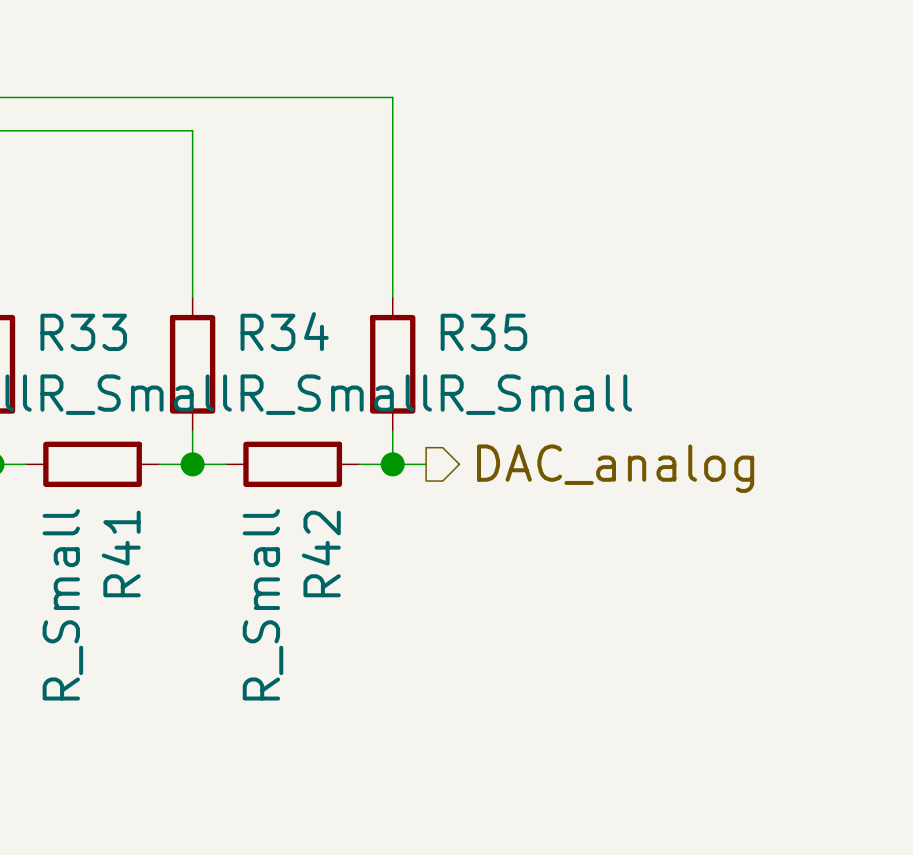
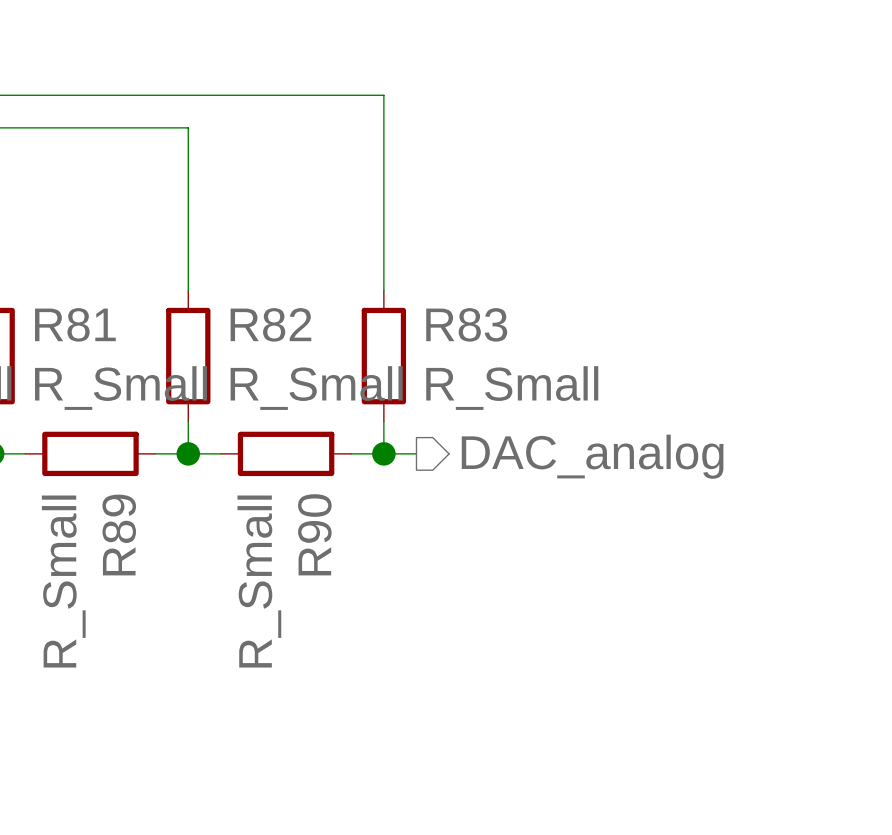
R34 name: R34 (284, 331) -> R82 (270, 324)
R33 name: R33 (83, 332) -> R81 (75, 324)
R35 name: R35 (483, 332) -> R83 (466, 324)
R41 name: R41 (121, 553) -> R89 (119, 535)
R42 name: R42 (321, 553) -> R90 (314, 534)

